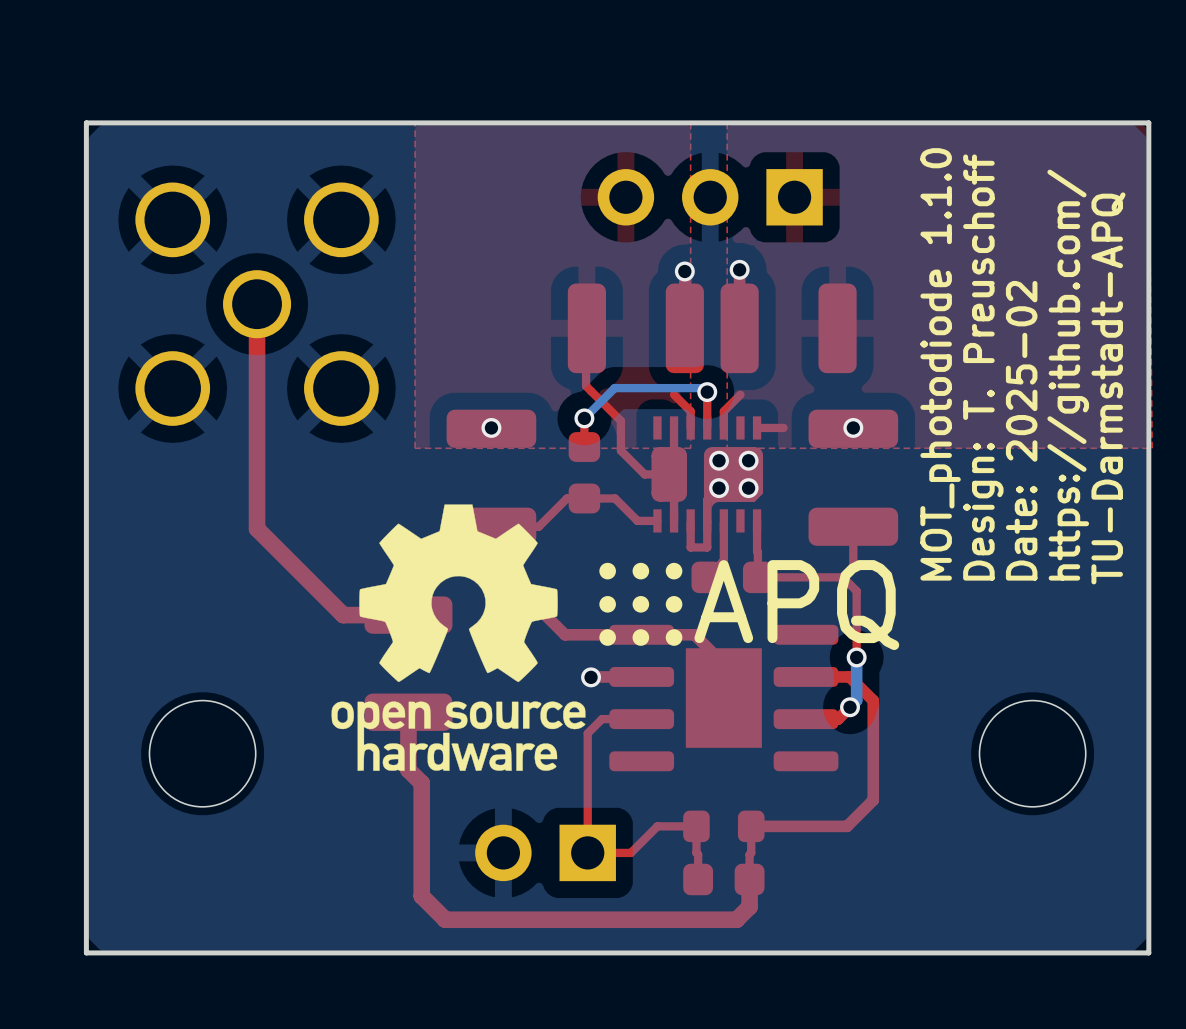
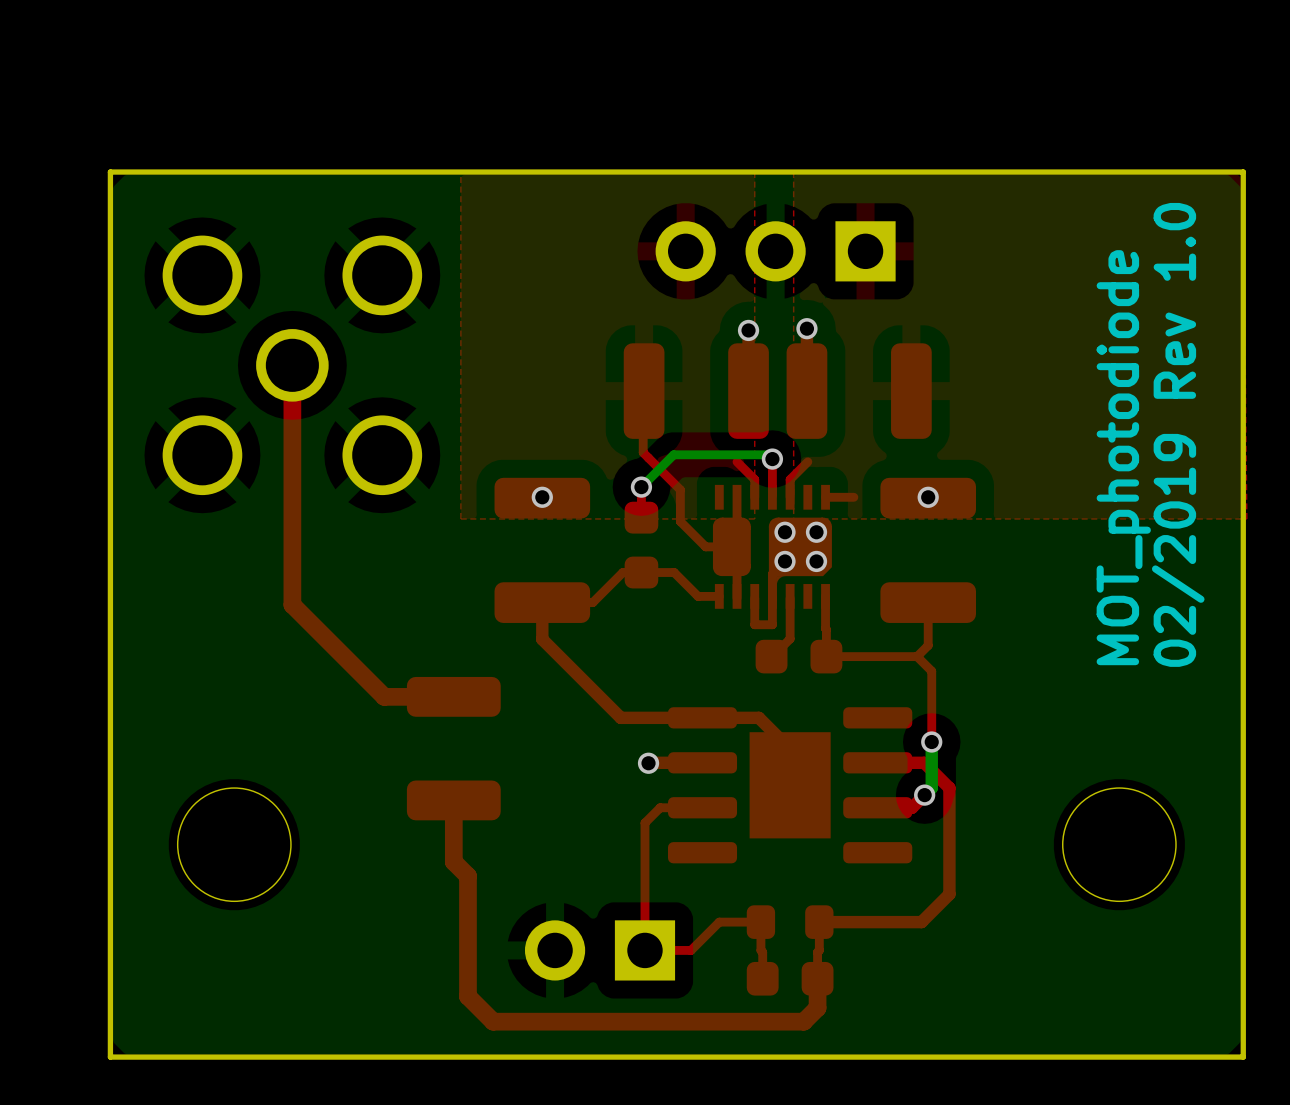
text: MOT_photodiode 1.1.0 (940, 364) -> none
text: Design: T. Preuschoff (983, 367) -> none
text: none -> 02/2019 Rev 1.0 (1178, 434)
text: https://github.com/ (1068, 375) -> none
text: TU-Darmstadt-APQ (1108, 388) -> none
text: Date: 2025-02 (1021, 430) -> MOT_photodiode (1123, 457)
drawing: [331, 504, 683, 771] -> none

